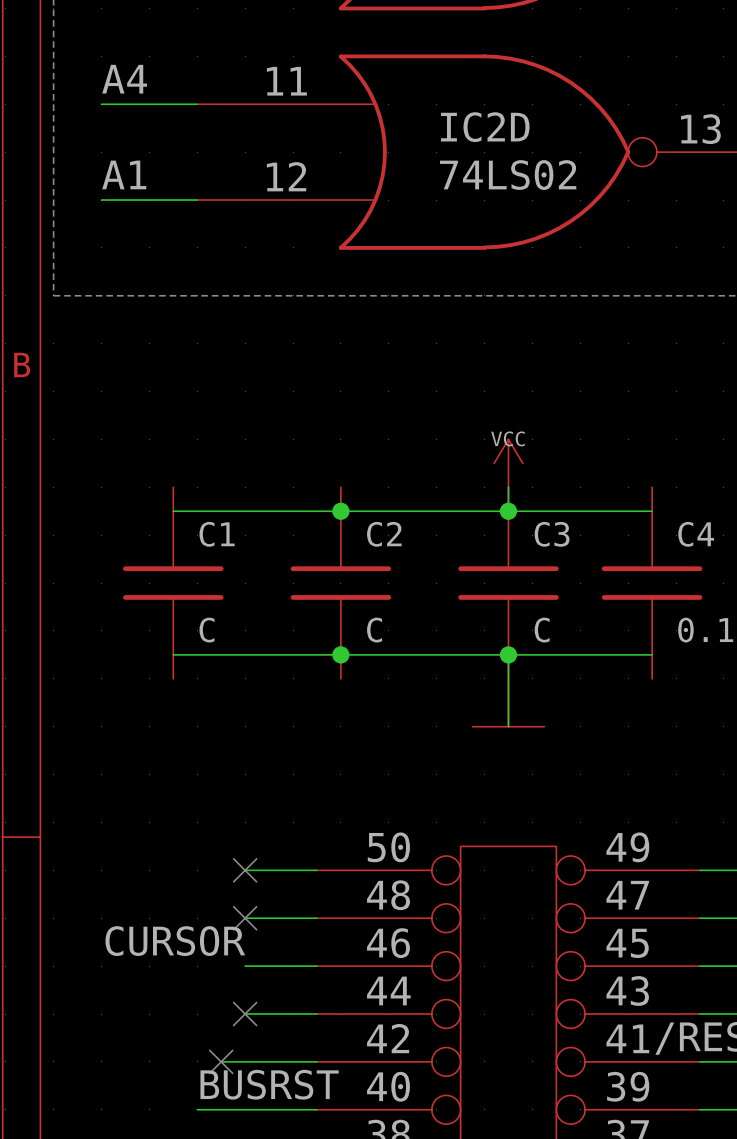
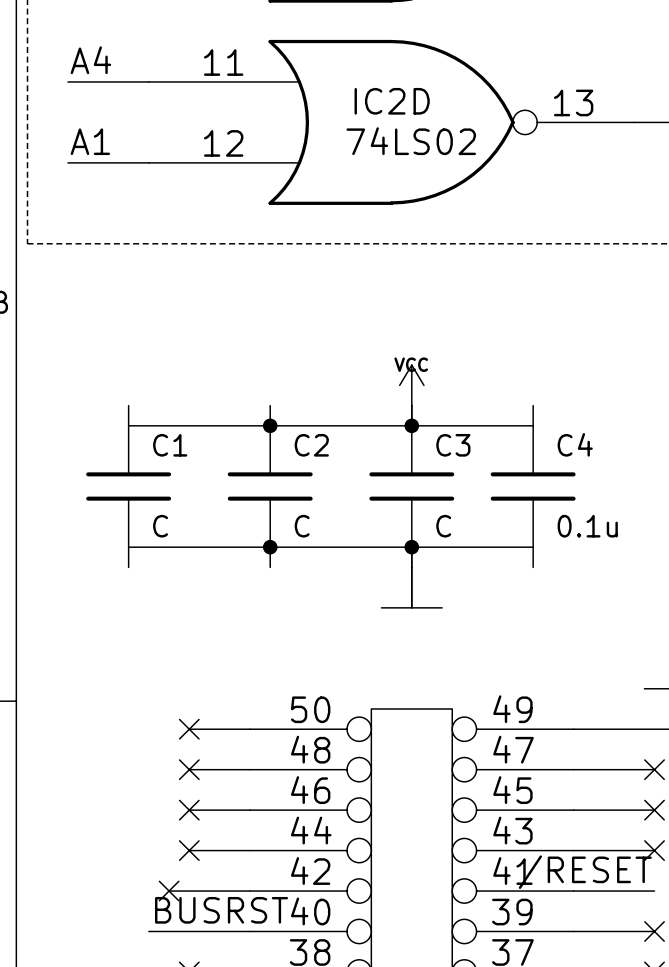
label: CURSOR (175, 941) -> none
no-connect mark: none -> (189, 810)

